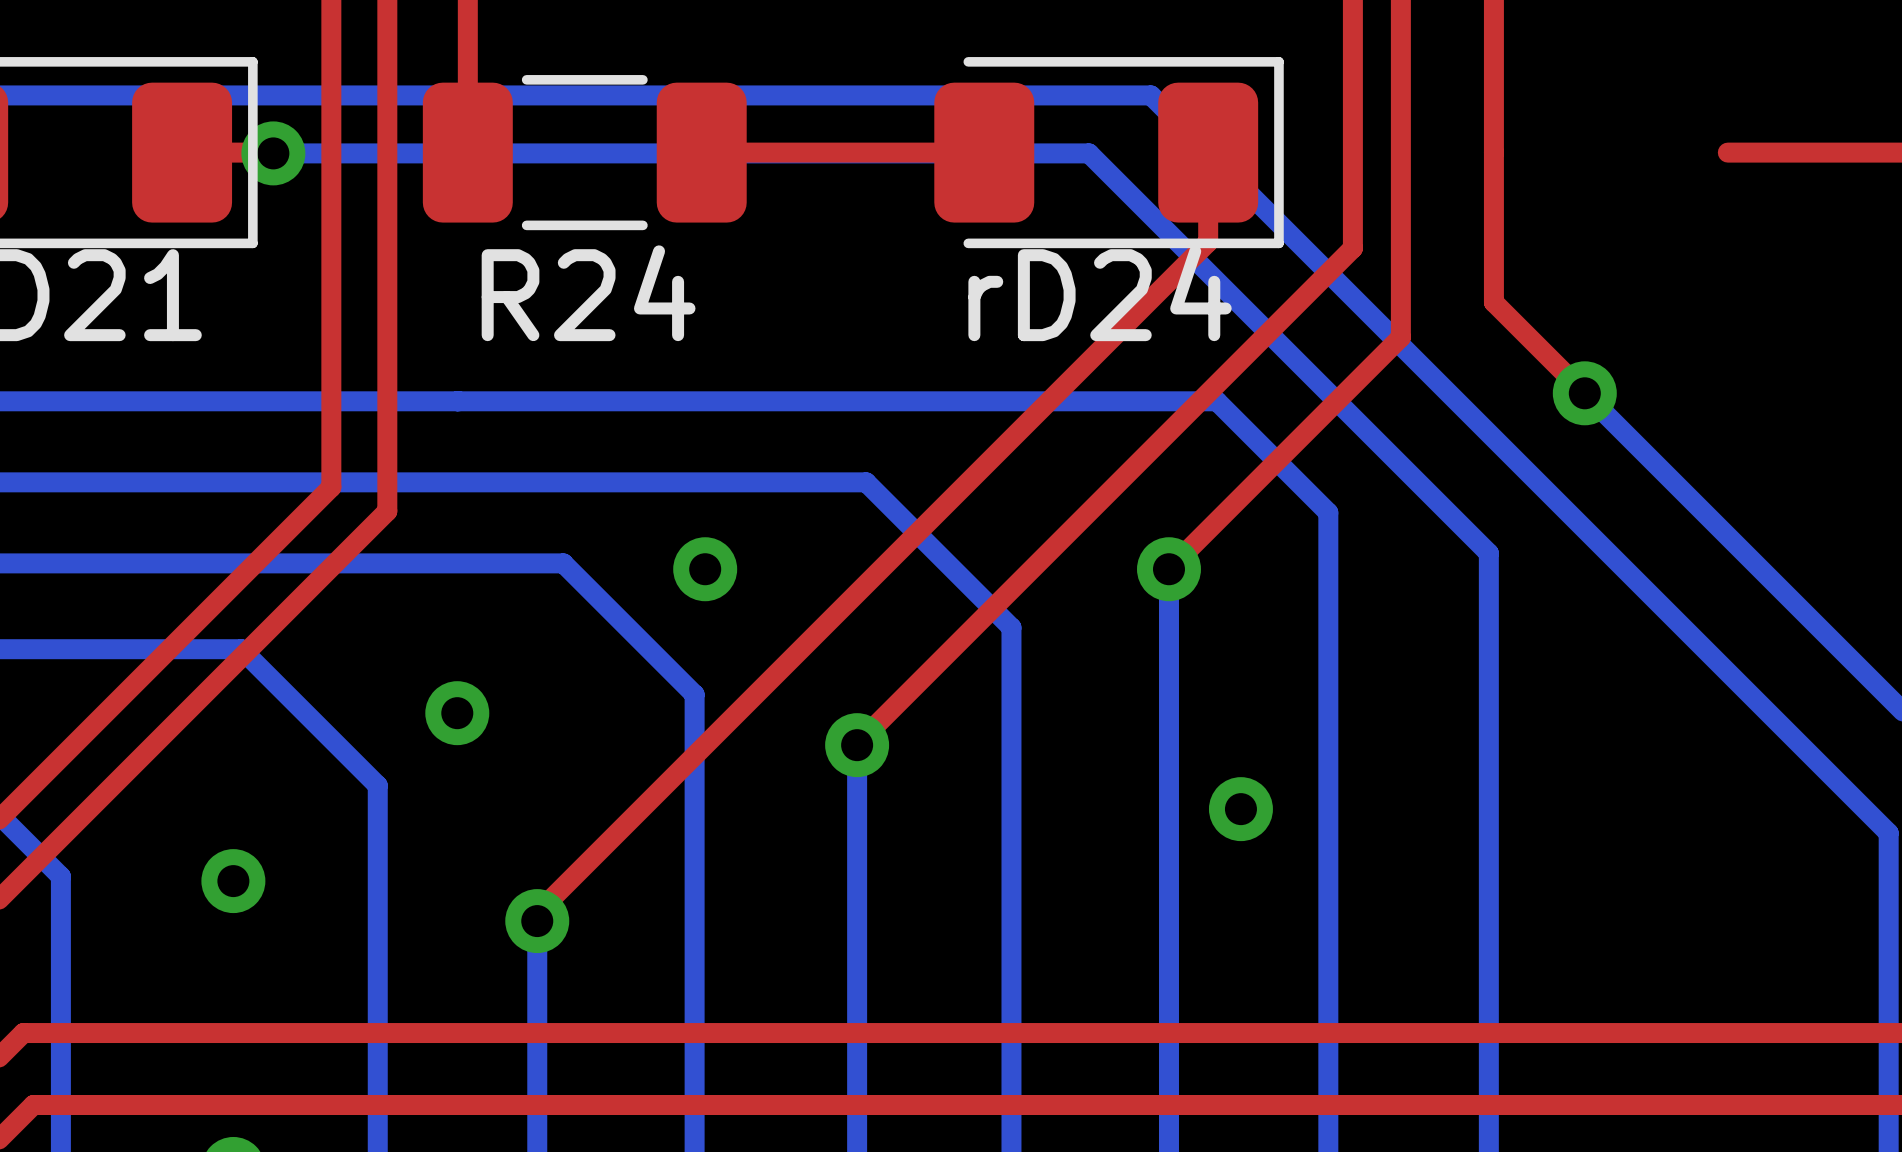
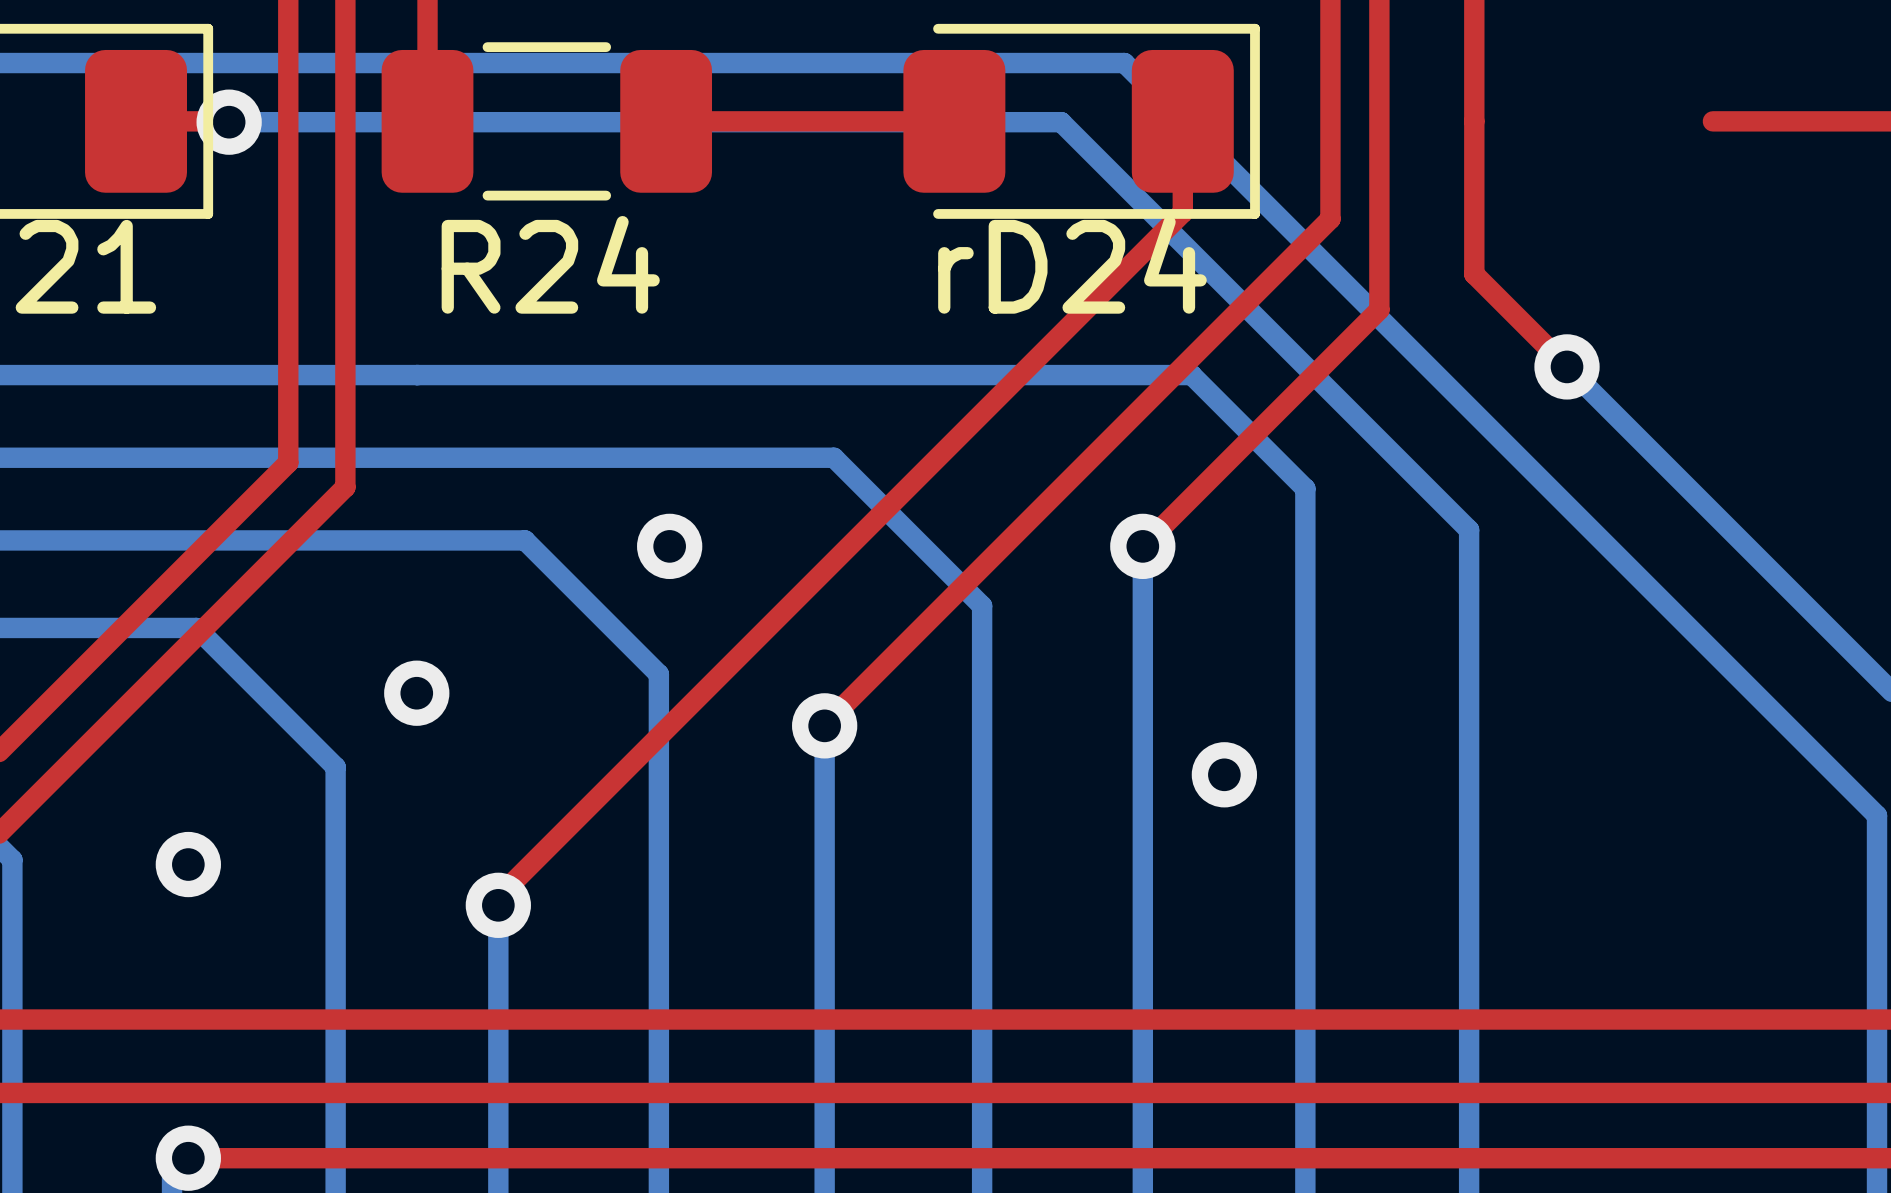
via position: (1240, 809) -> (1224, 774)

